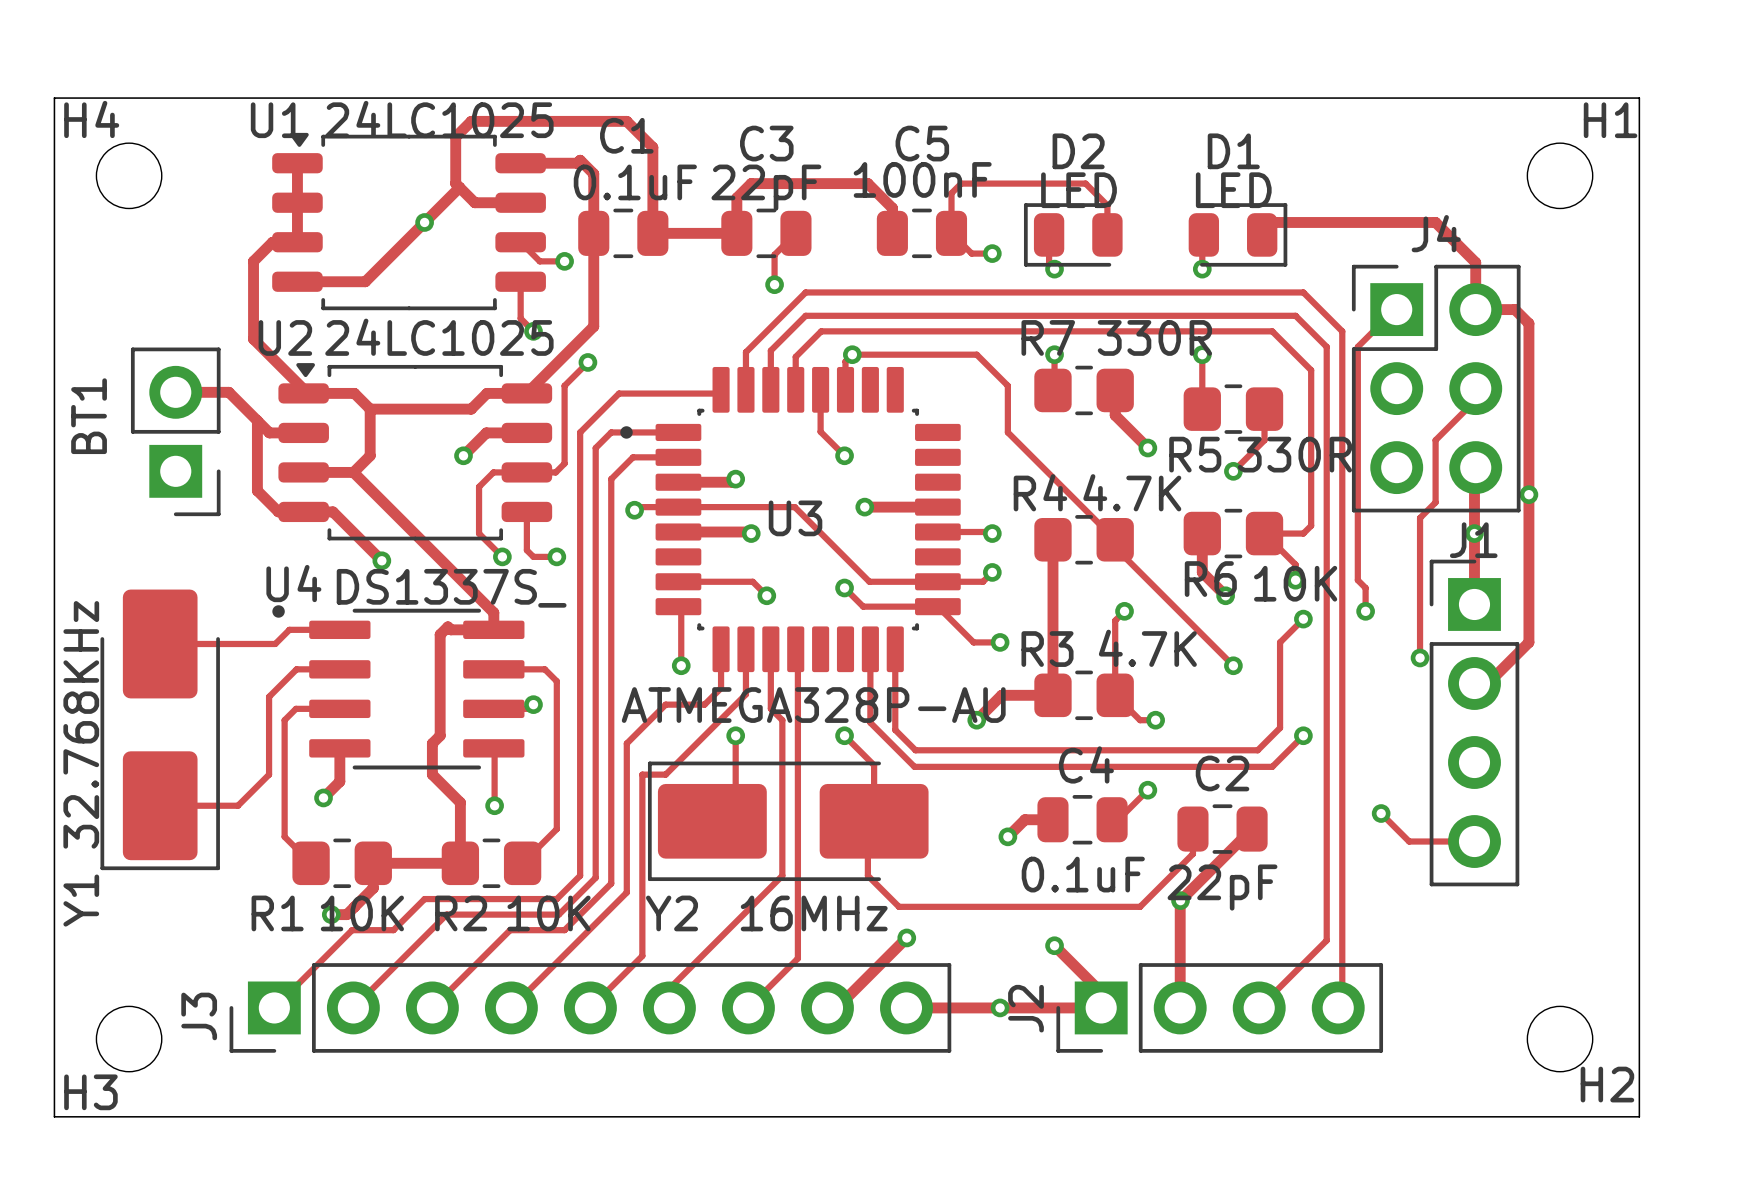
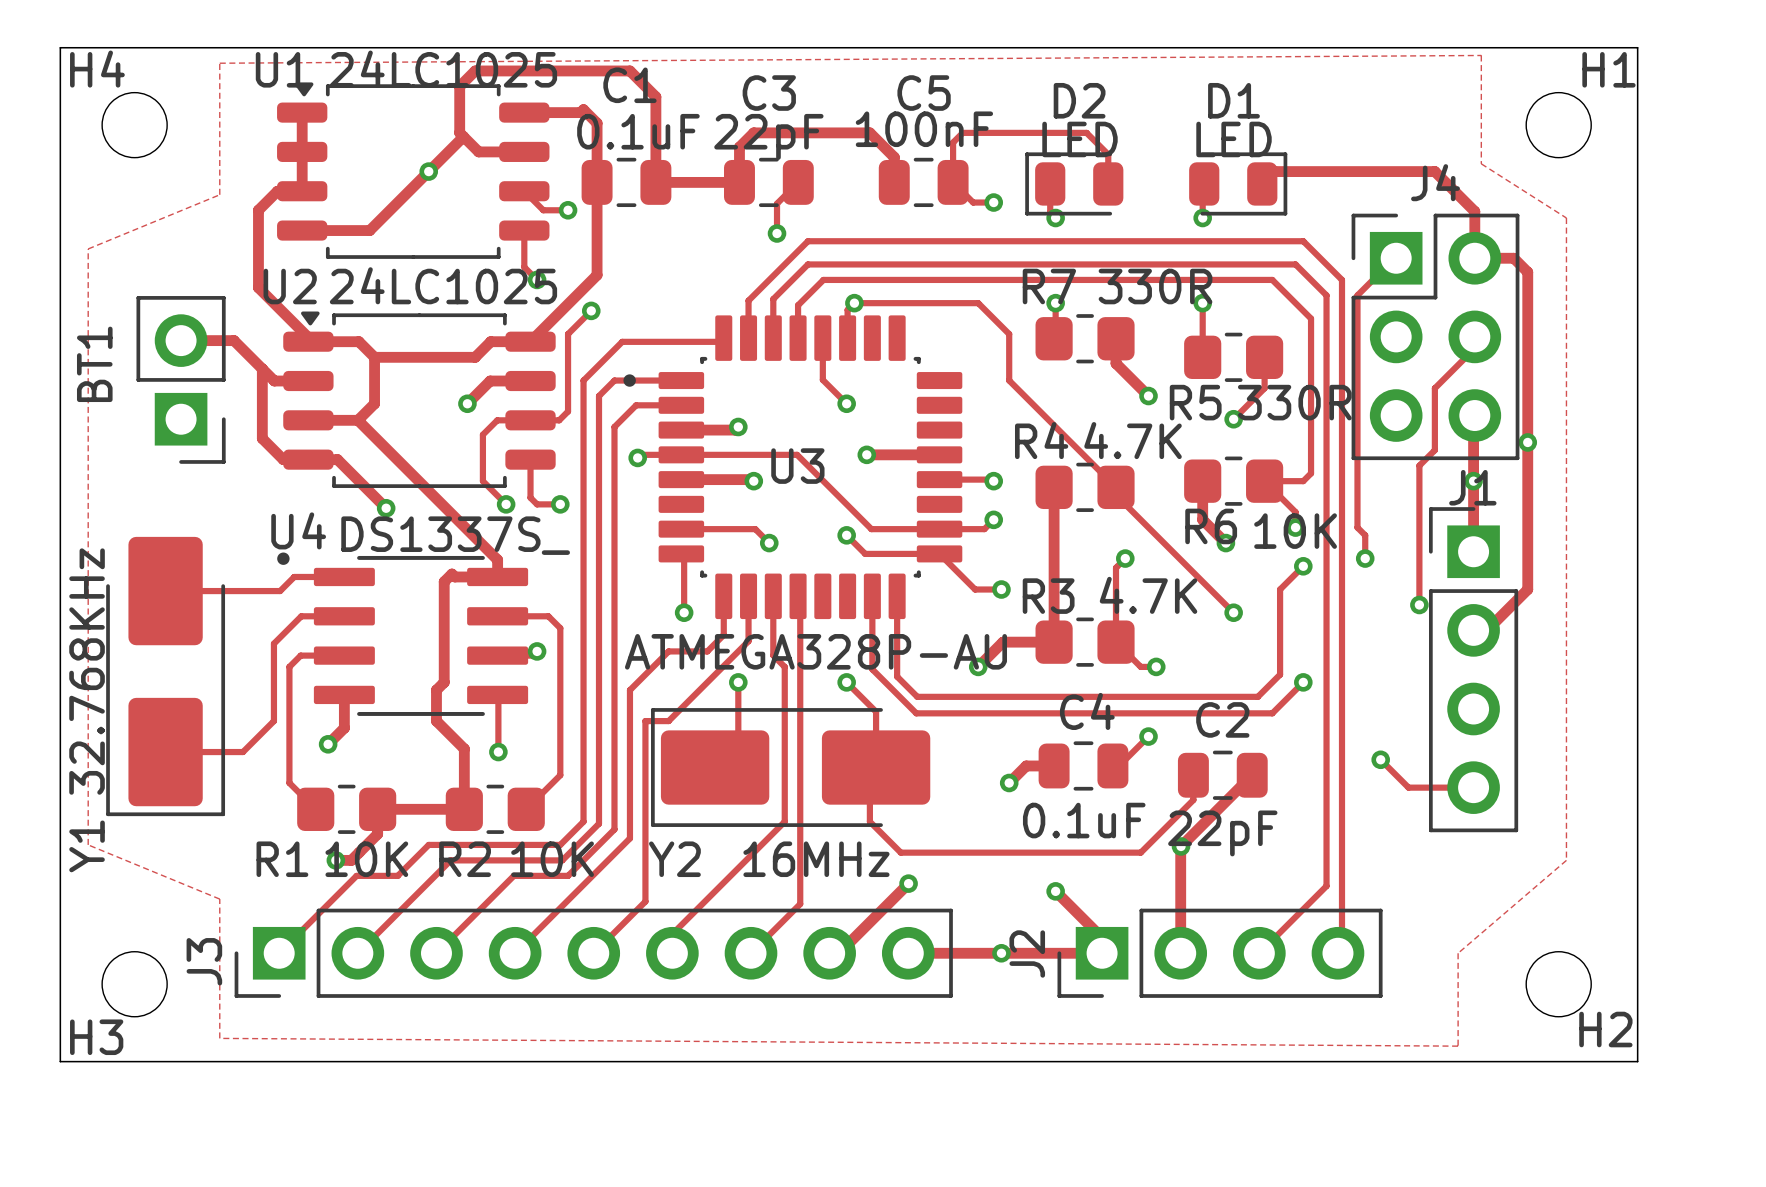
zone outline: none -> (1481, 55) (1481, 163) (1566, 218) (1566, 860) (1458, 953) (1458, 1046) (219, 1038) (219, 899) (88, 844) (88, 248) (219, 194) (219, 63) (1481, 55)

